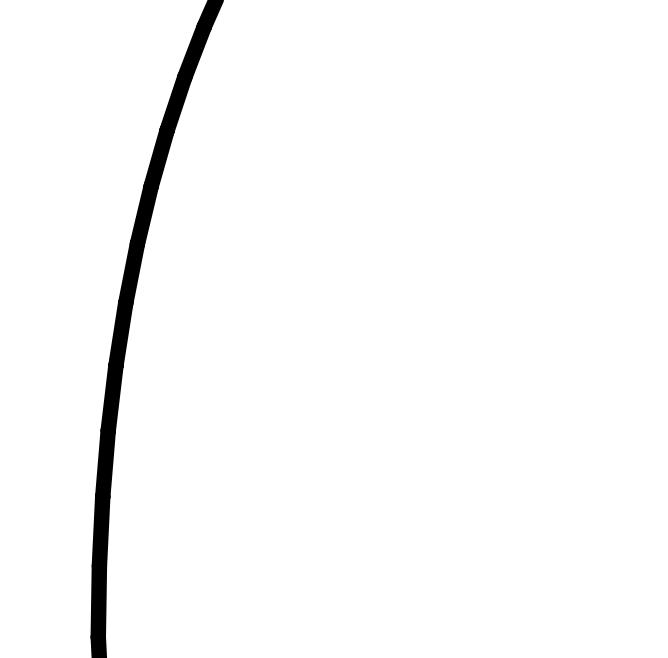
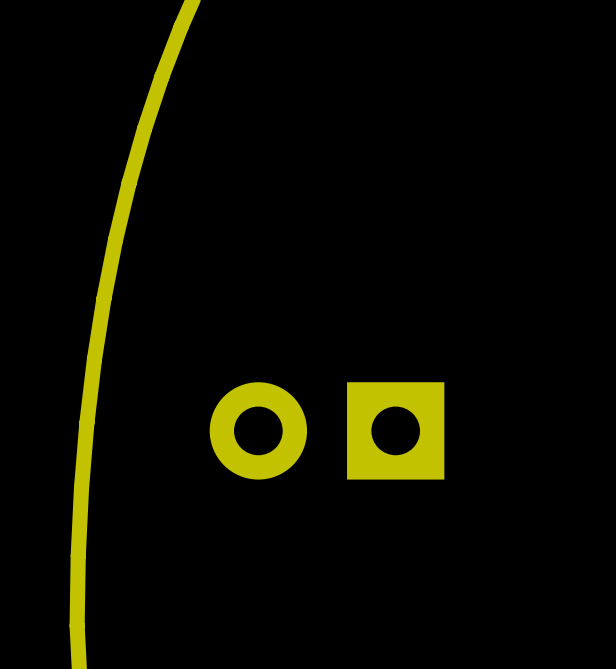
part: none -> (327, 430)

